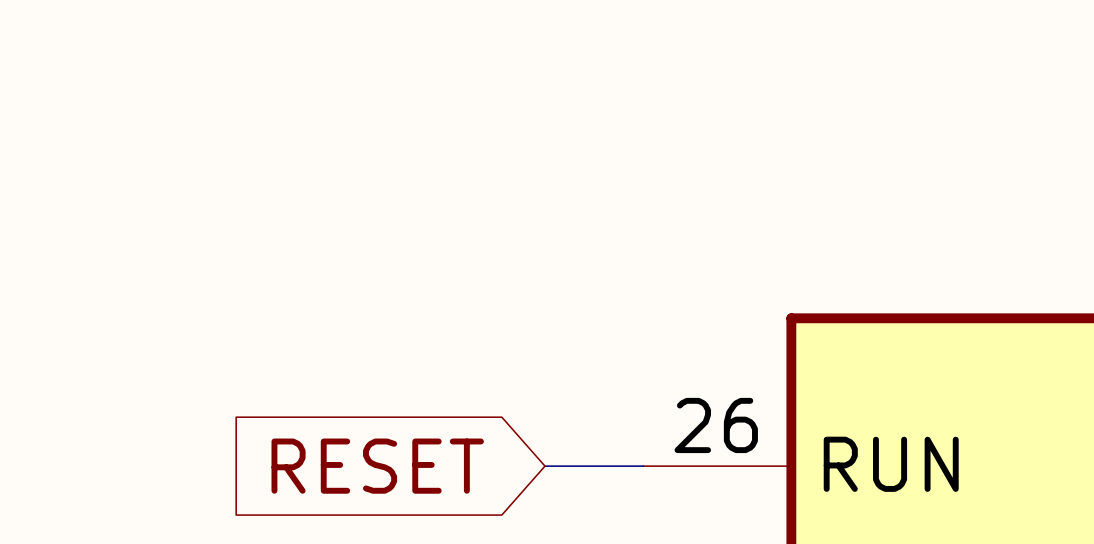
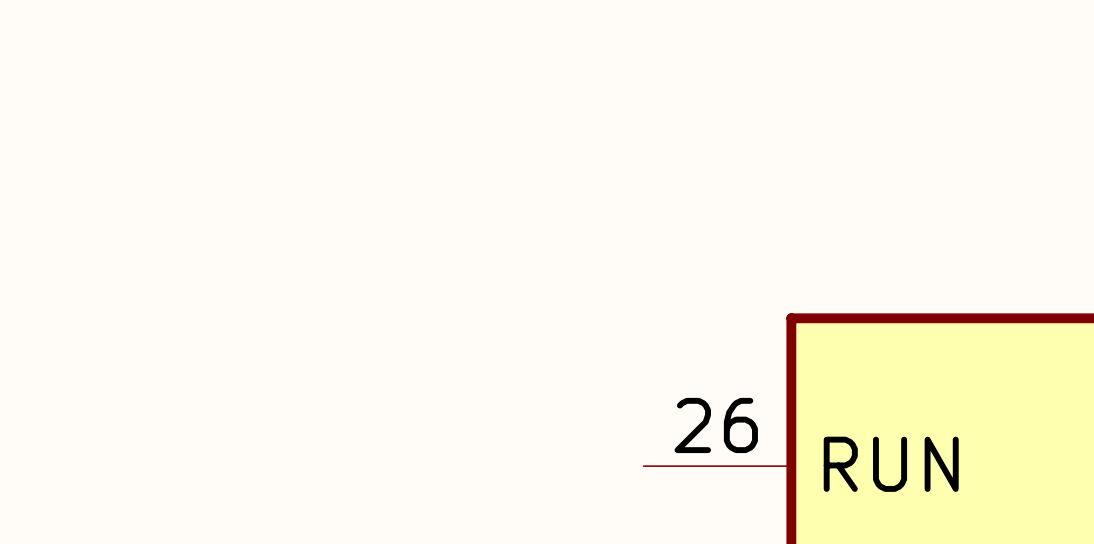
global label: RESET (377, 466) -> none
wire: (544, 466) (643, 466) -> none

